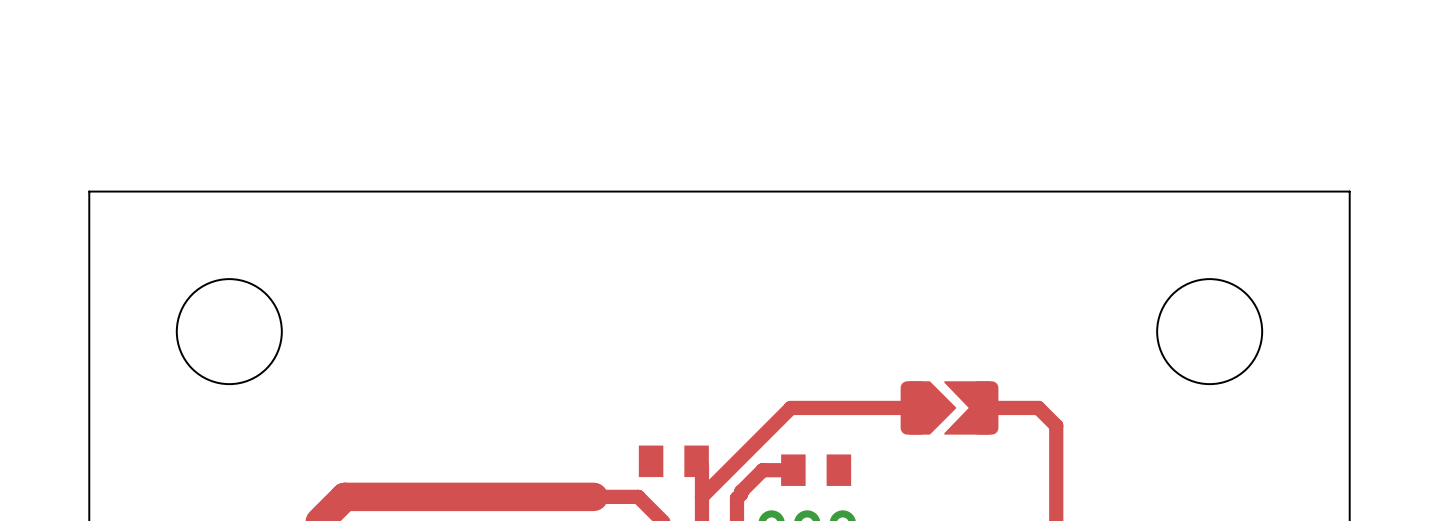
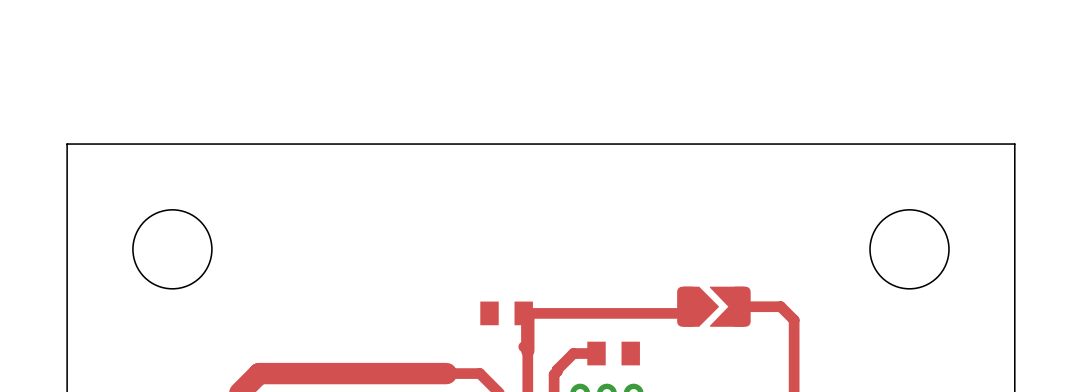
top track: (913, 407) (790, 407) (701, 496) -> (687, 306) (680, 313) (523, 313) (527, 317) (527, 350)
part position: (673, 461) -> (506, 313)

